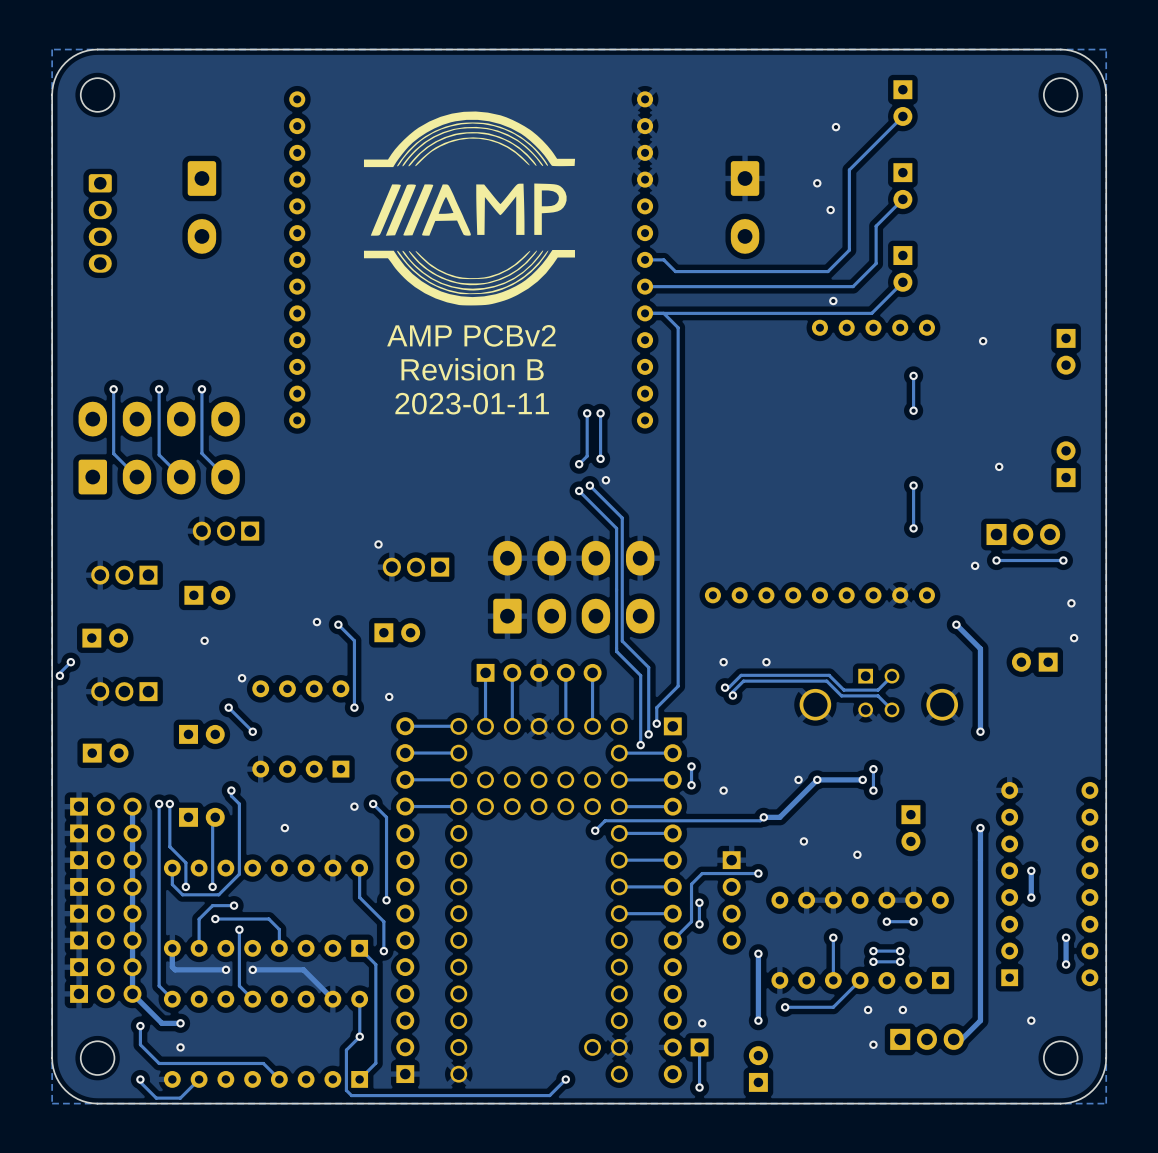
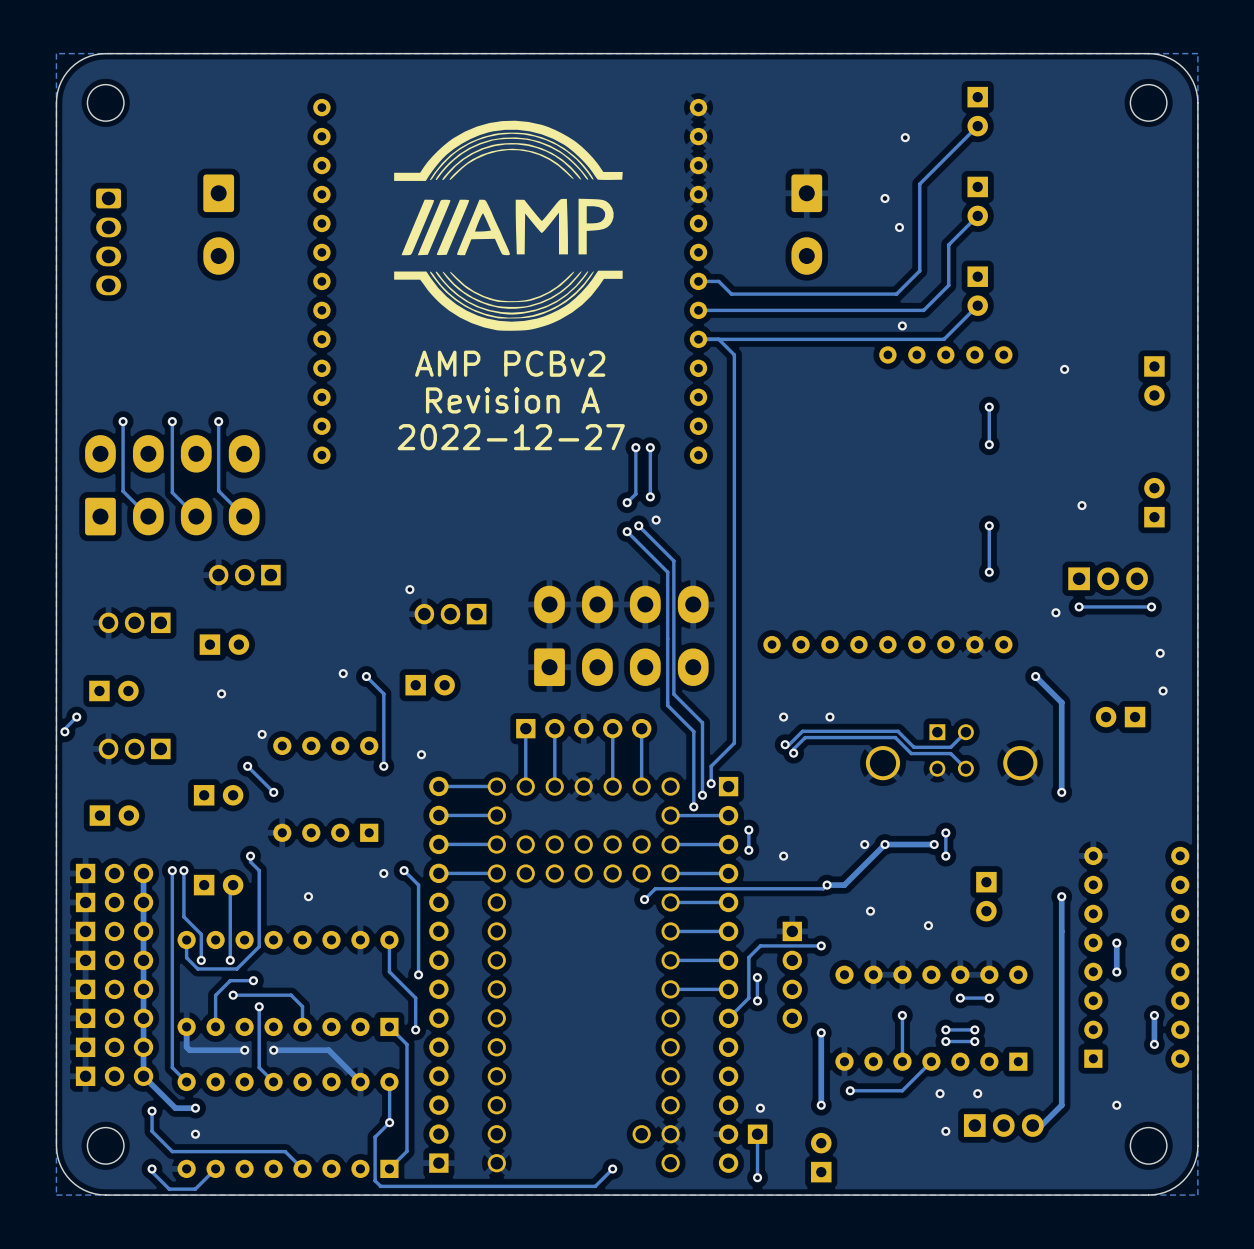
text: Revision B (472, 369) -> Revision A (512, 400)
text: 2023-01-11 (472, 403) -> 2022-12-27 (511, 437)

